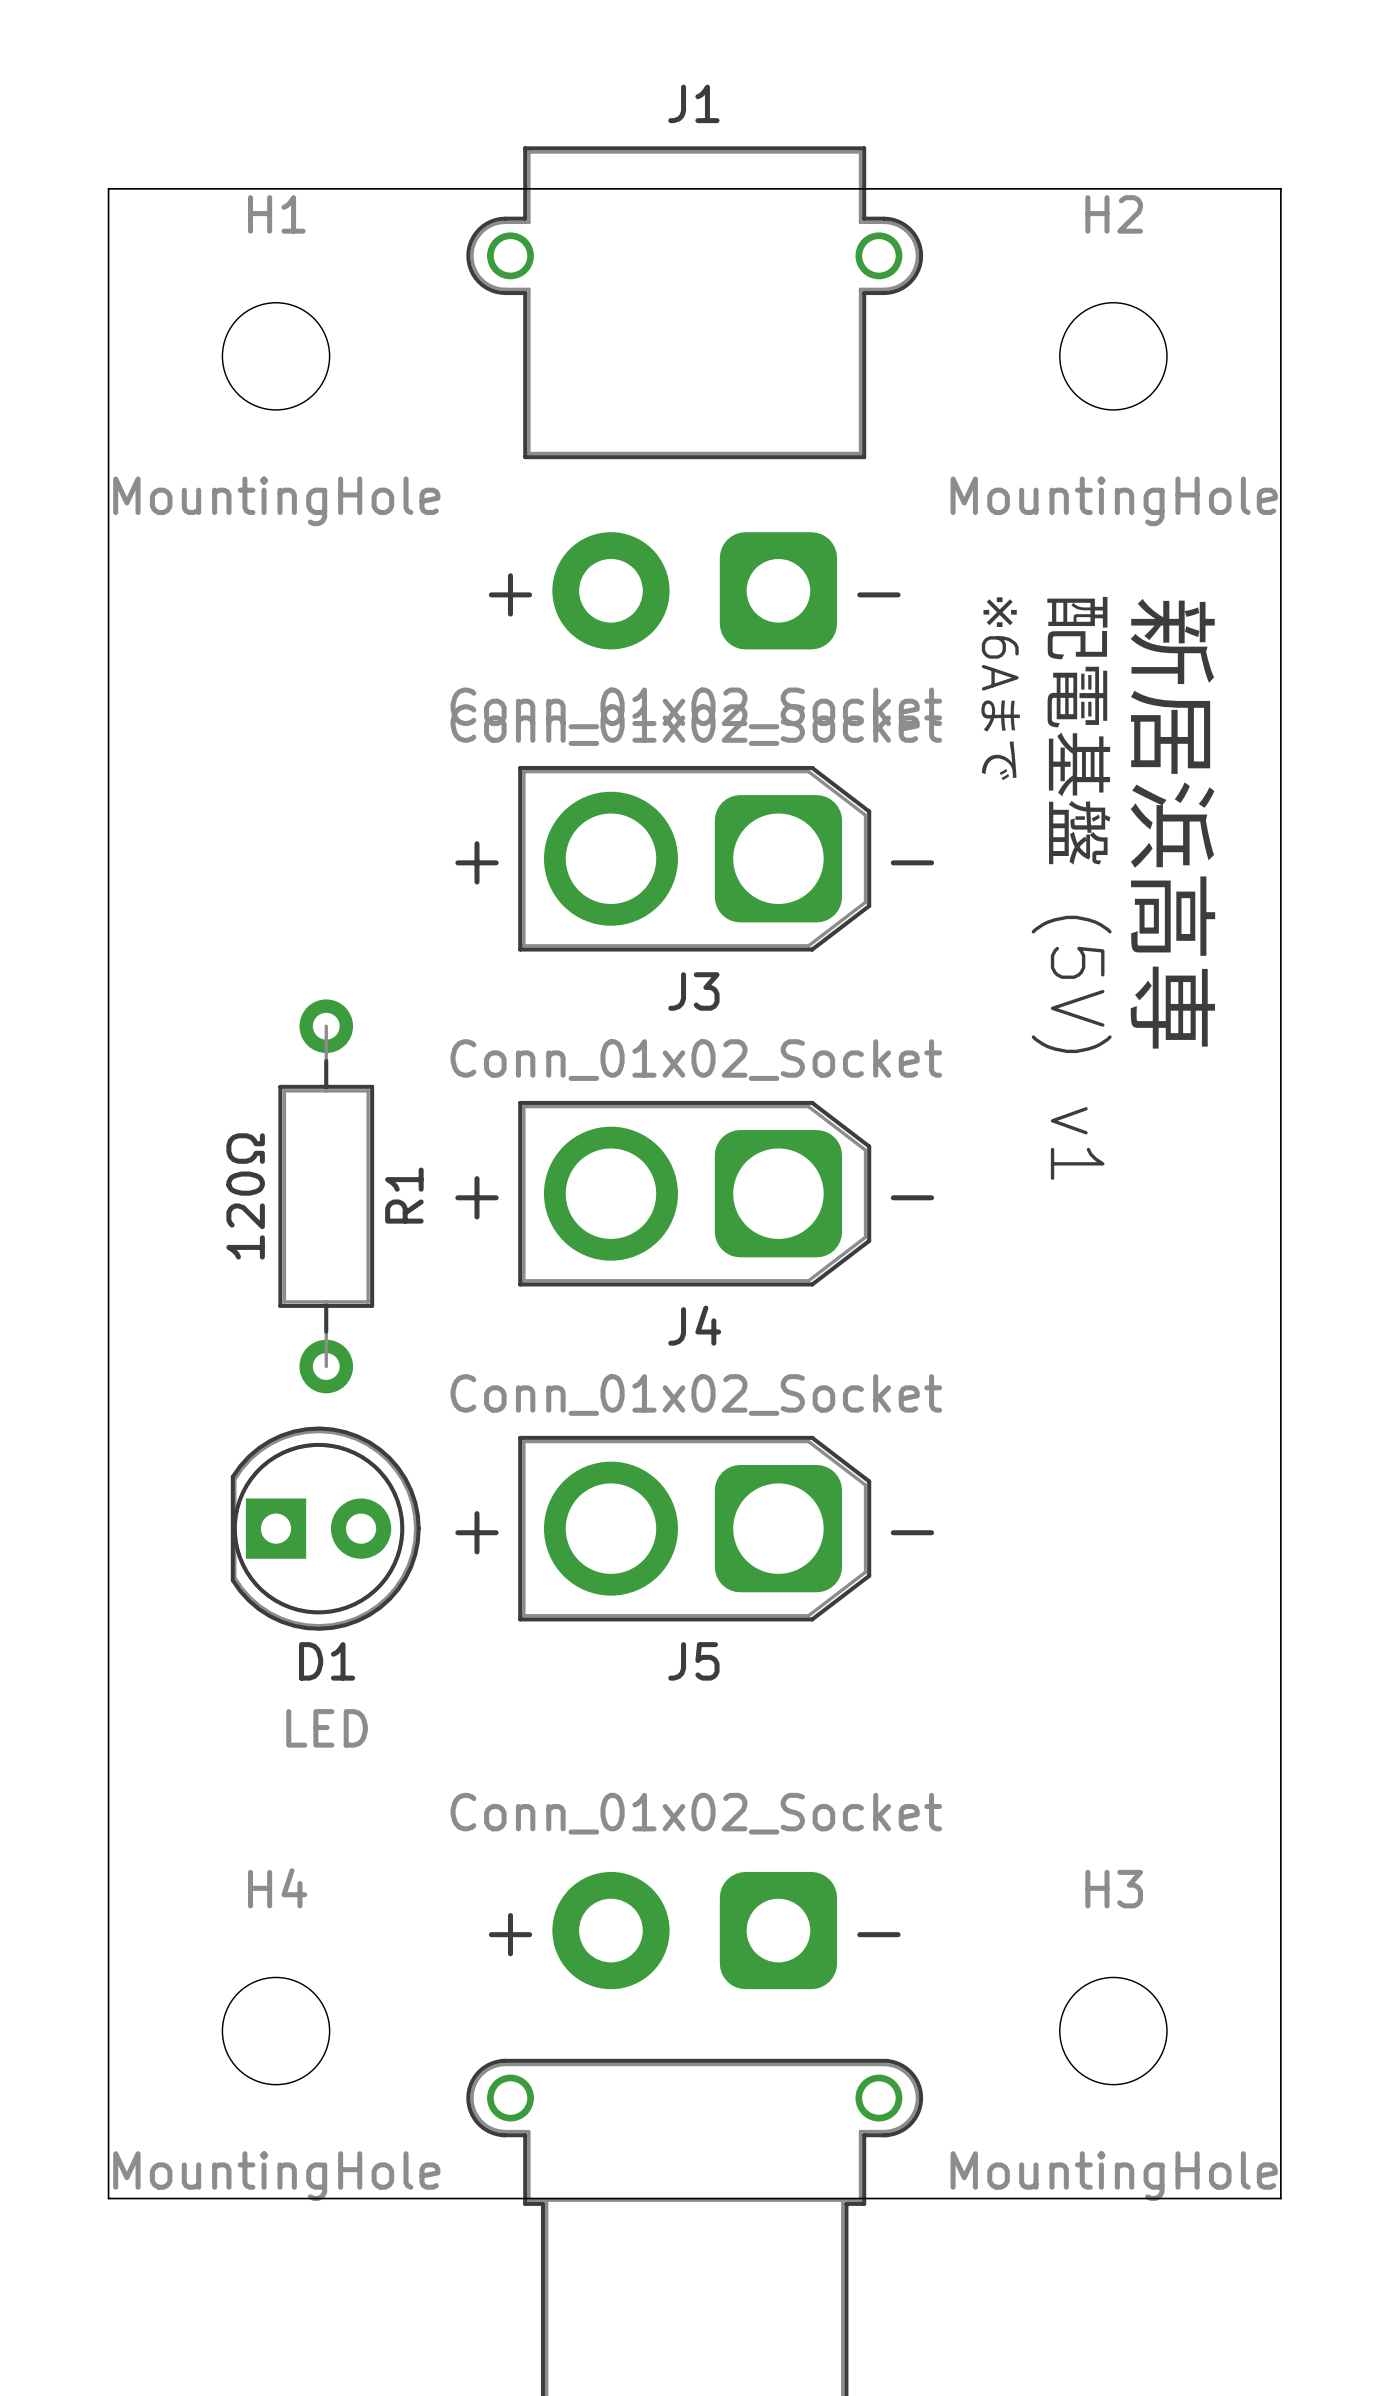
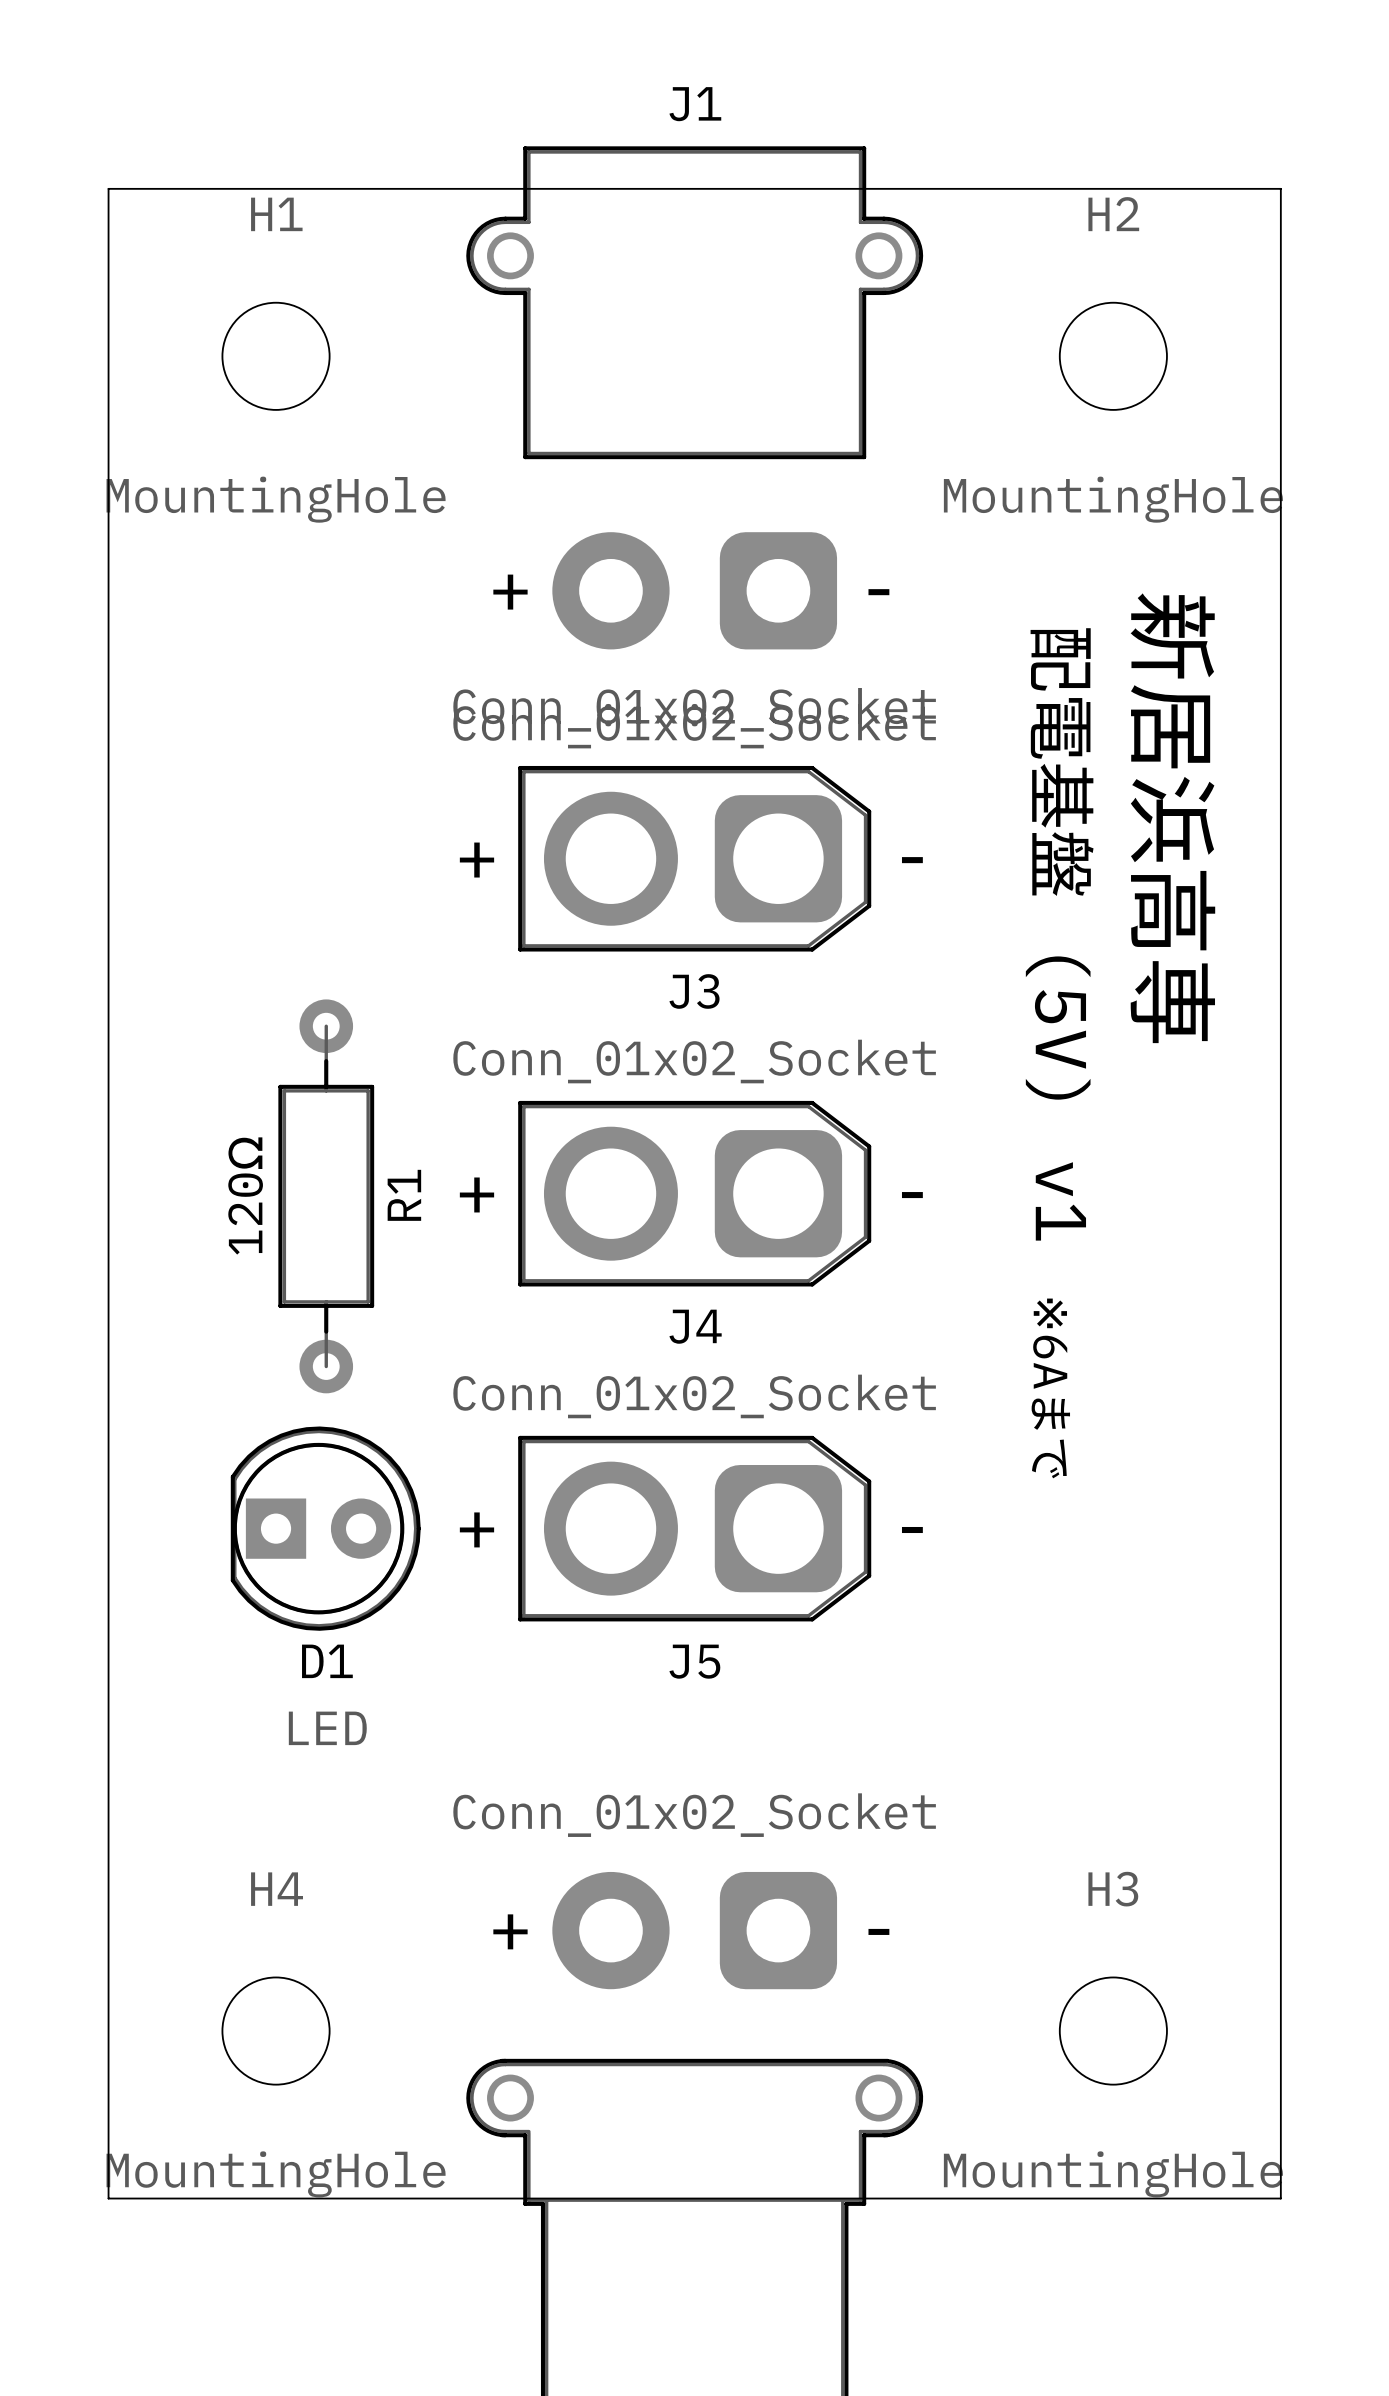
text position: ※6Aまで (1000, 688) -> ※6Aまで (1050, 1388)
text position: 配電基盤 (5V) v1 (1071, 887) -> 配電基盤 (5V) v1 (1059, 934)

